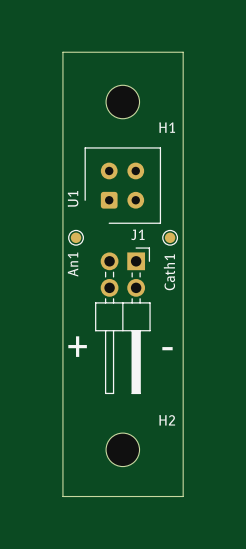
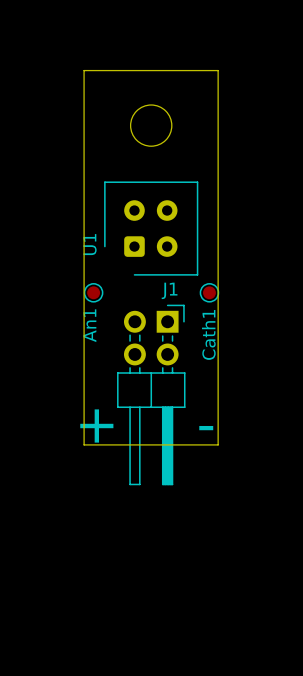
board edge: (62, 52) (62, 496) (183, 496) (183, 52) (62, 52) -> (84, 70) (84, 444) (218, 444) (218, 70) (84, 70)
H1 name: H1 (167, 127) -> none
H2: (122, 449) -> none

